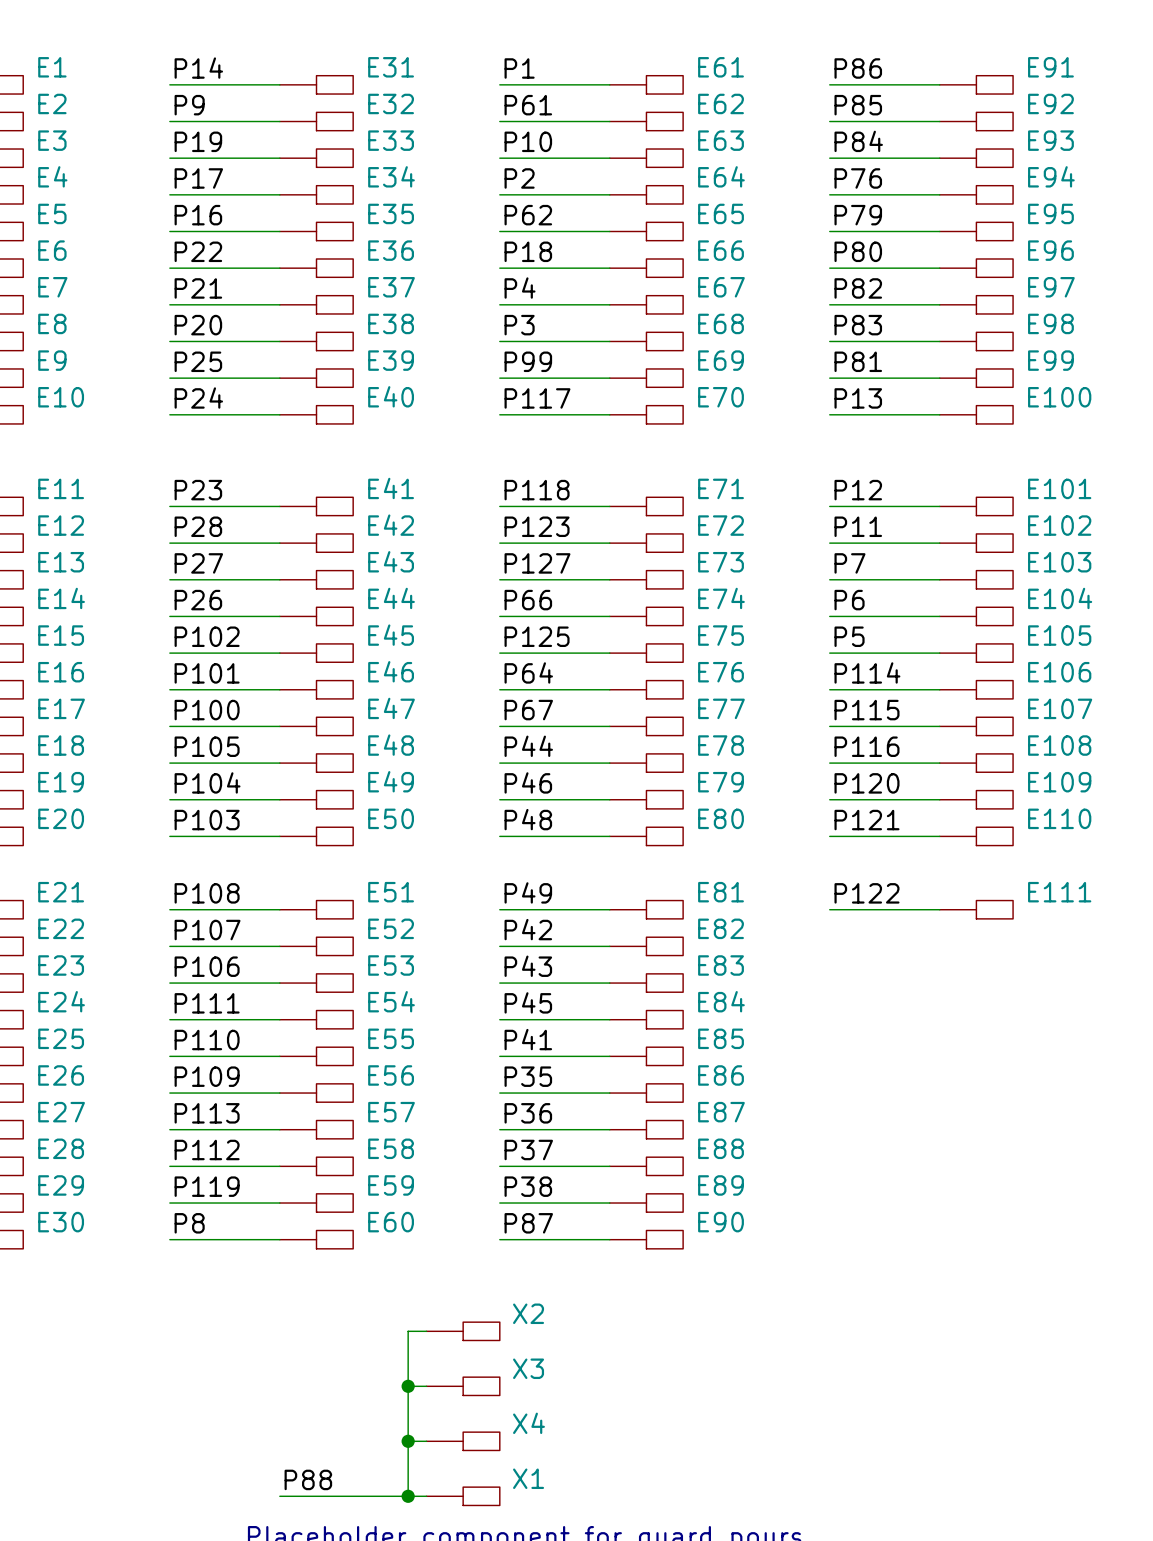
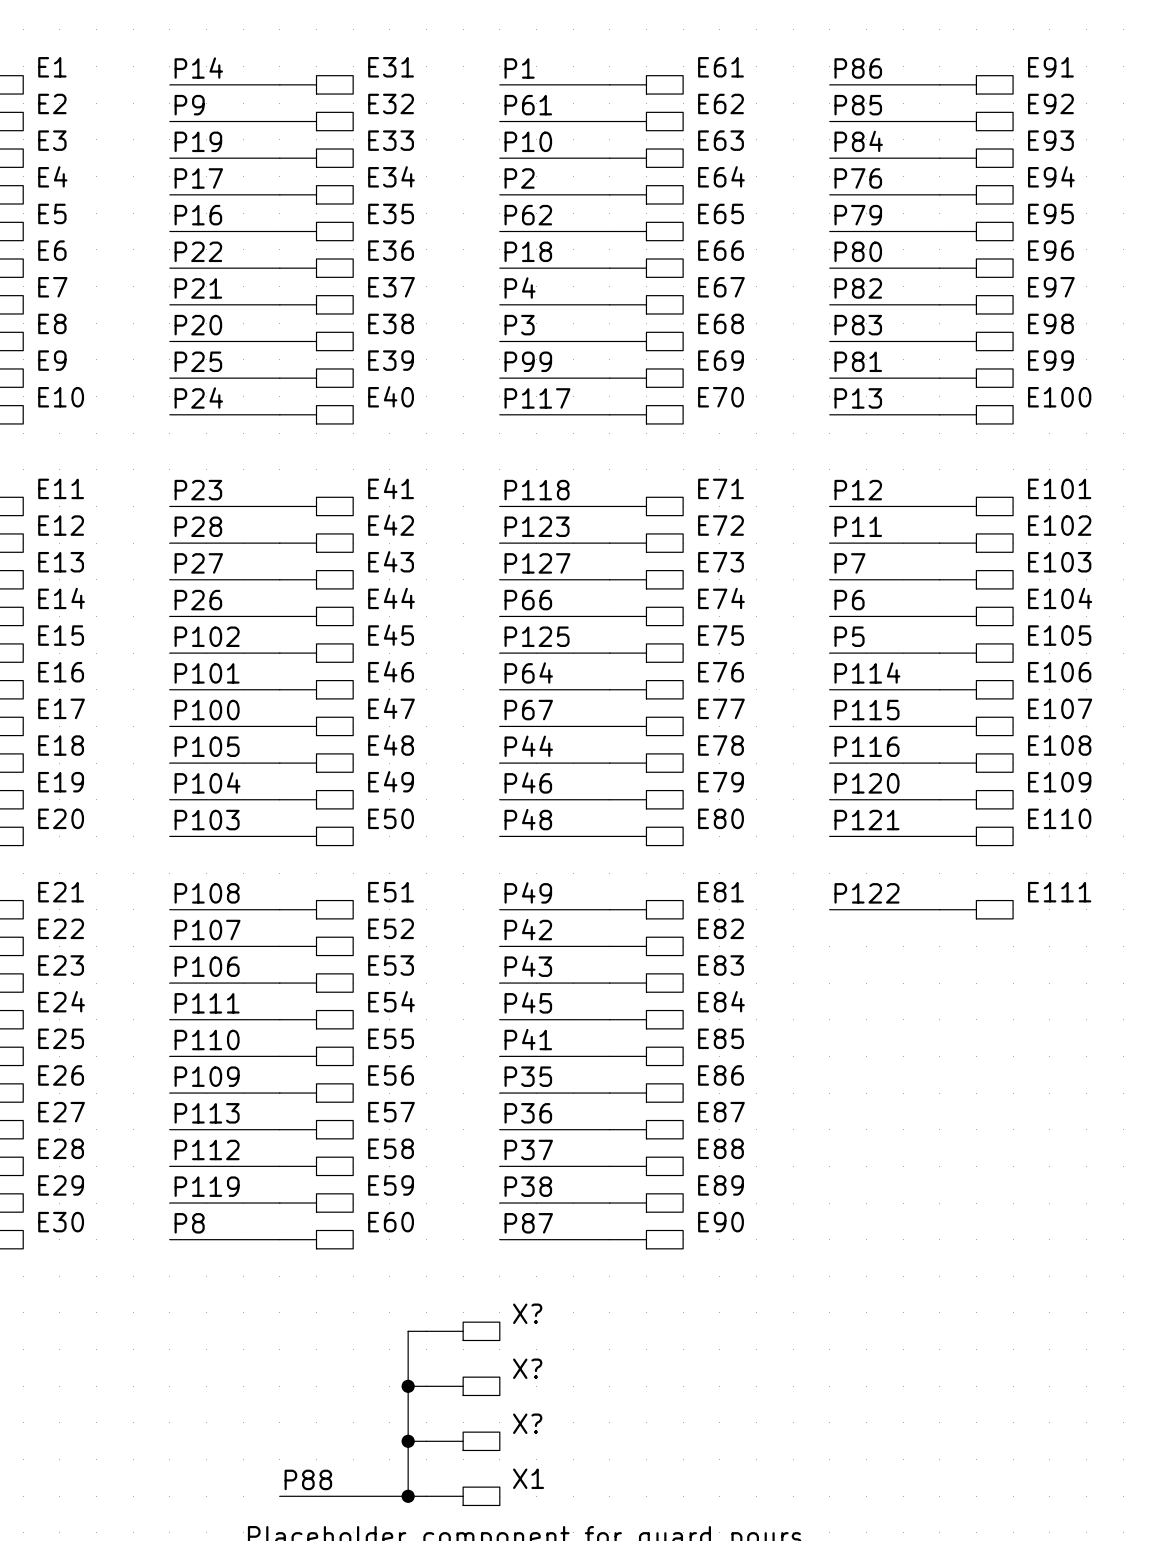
X2 name: X2 (528, 1313) -> X? (527, 1313)
X3 name: X3 (528, 1368) -> X? (527, 1368)
X4 name: X4 (528, 1423) -> X? (527, 1423)

